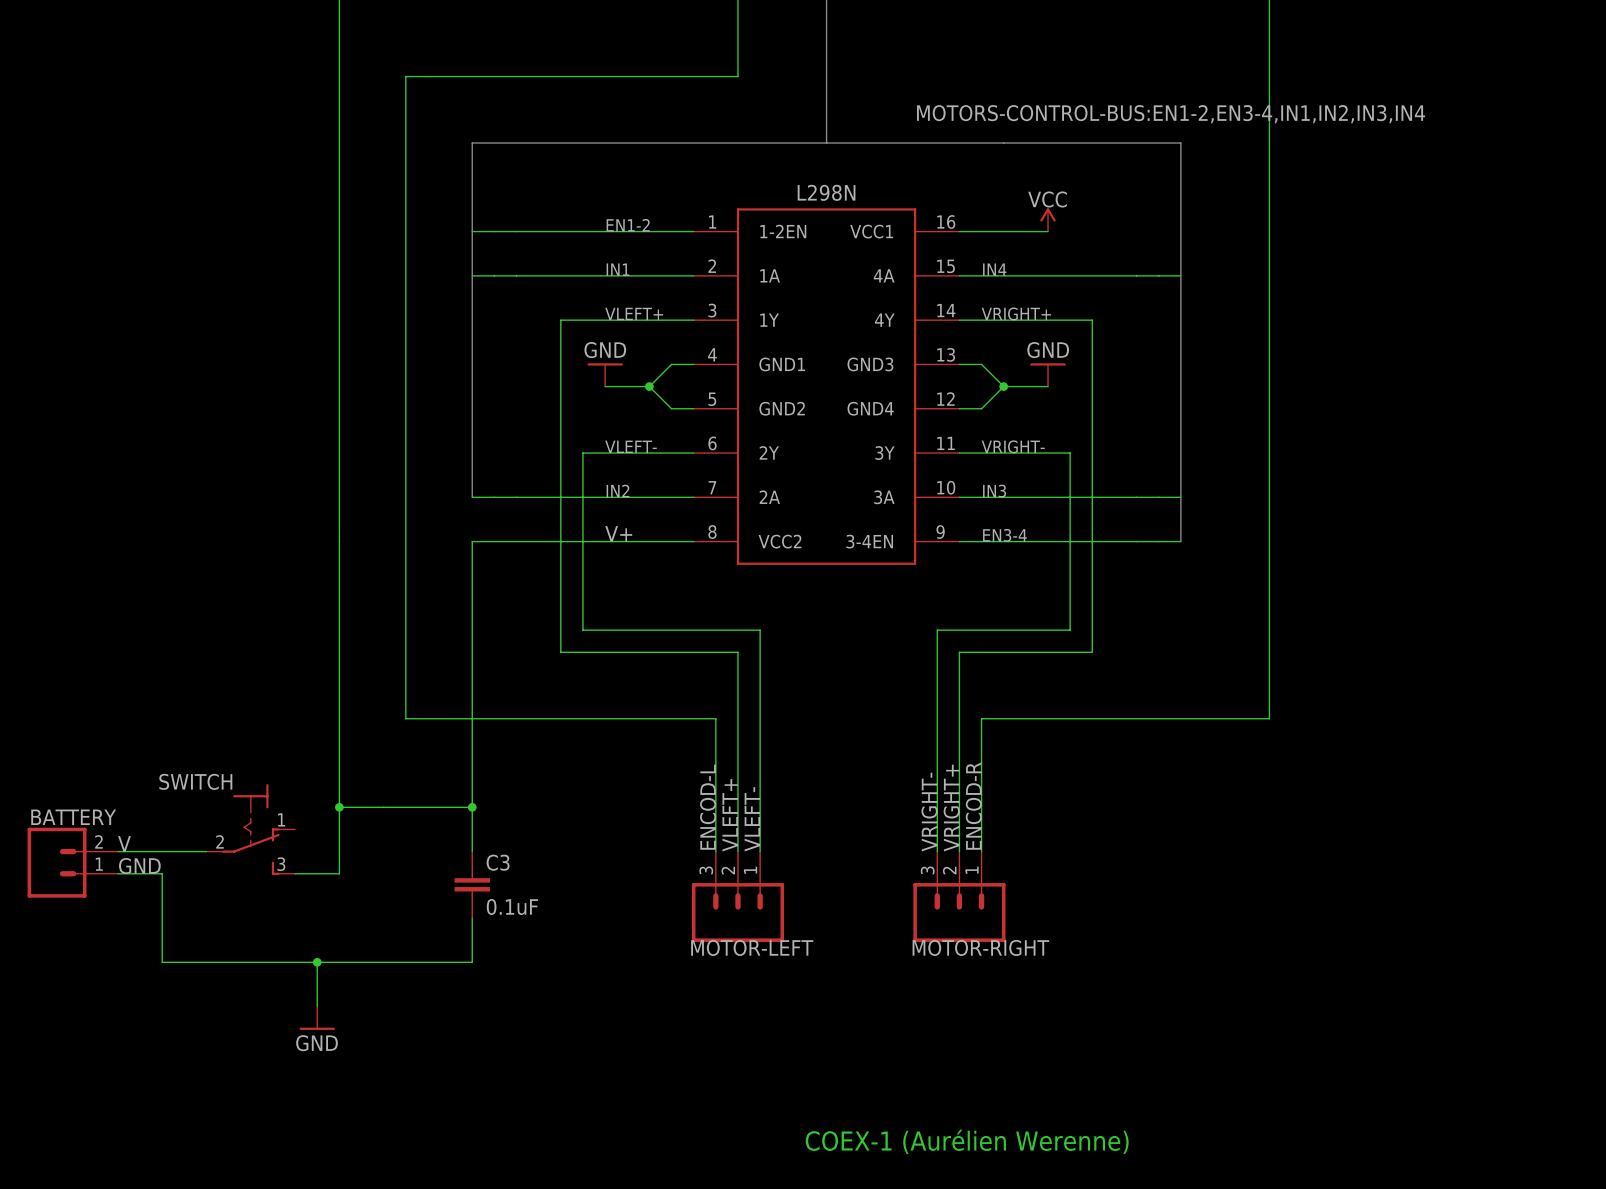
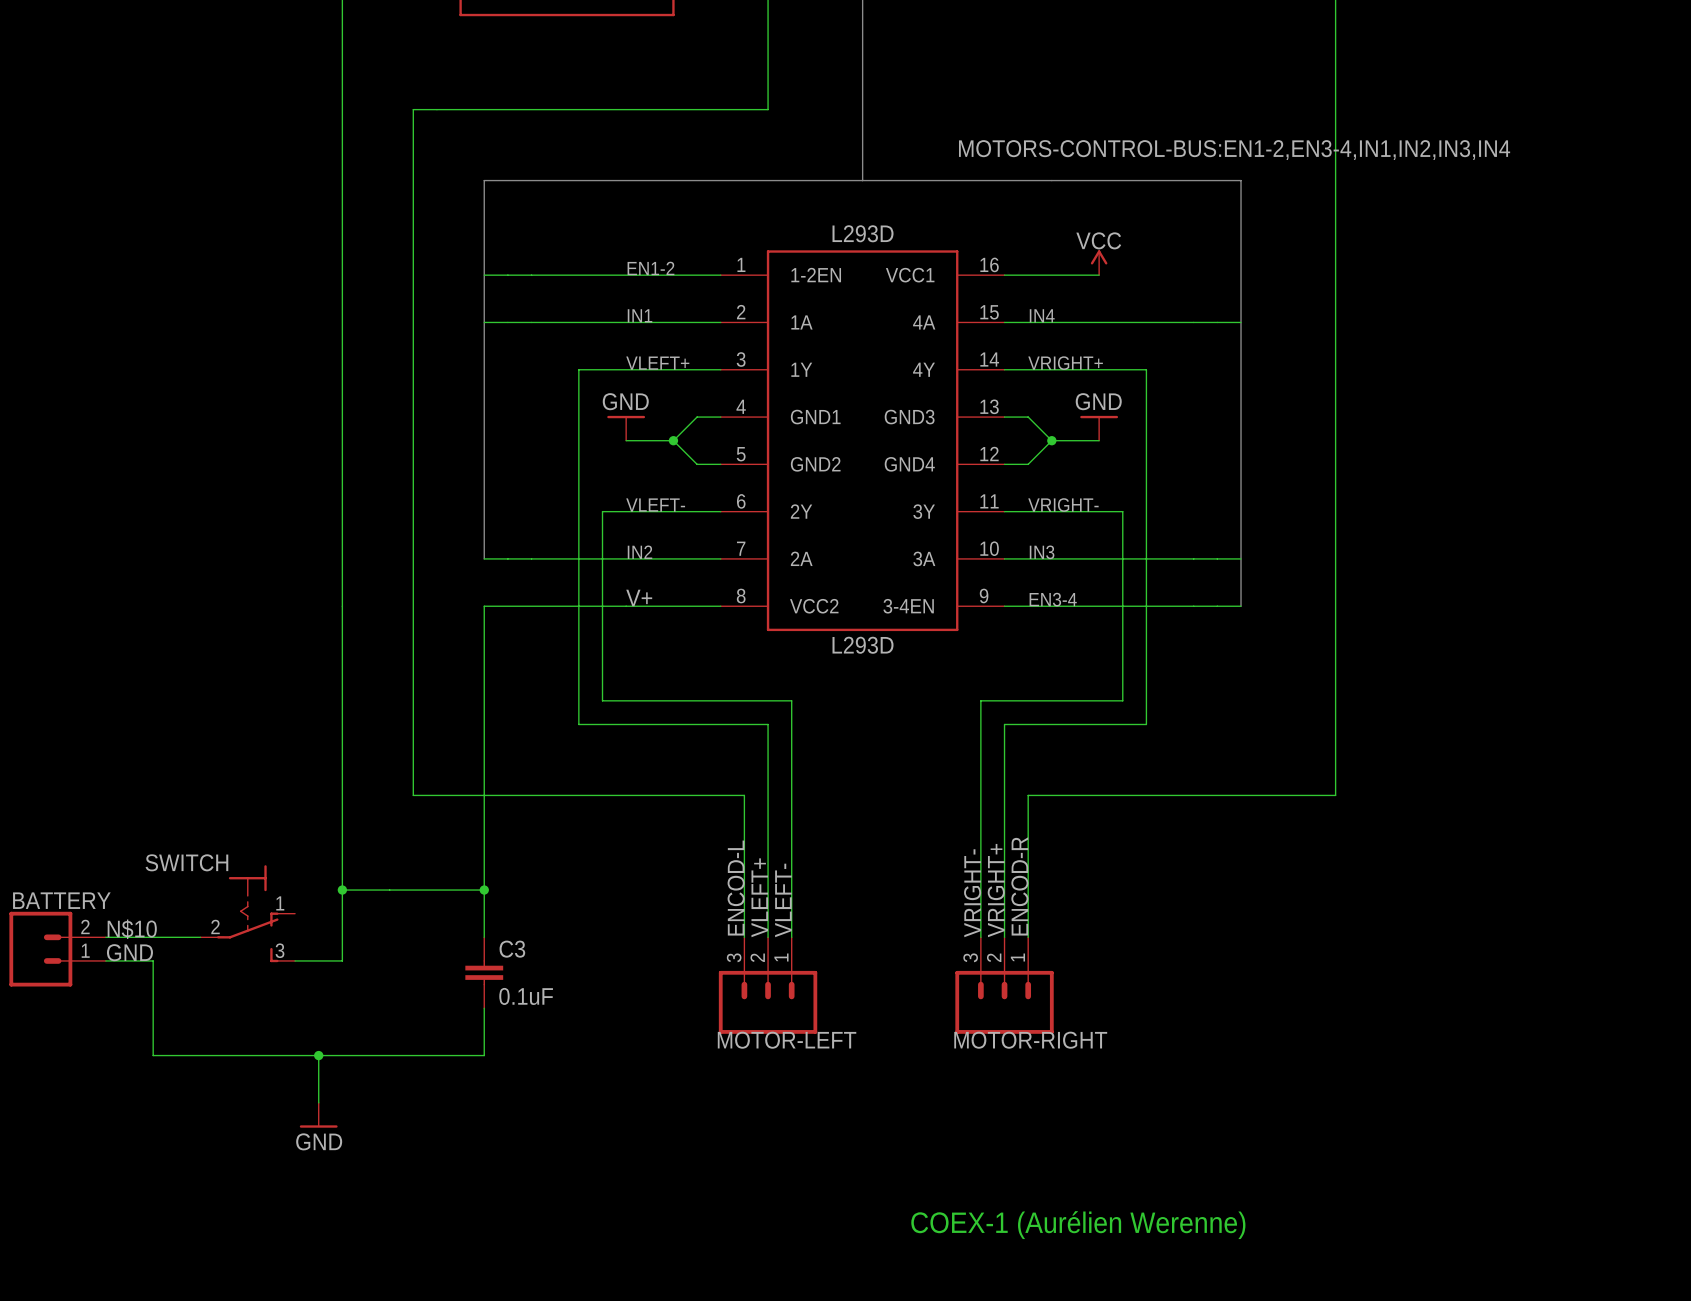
L298N name: L298N (826, 192) -> L293D (863, 233)
L298N value: none -> L293D (863, 645)
label: V (124, 843) -> N$10 (132, 929)
text position: COEX-1 (Aurélien Werenne) (967, 1141) -> COEX-1 (Aurélien Werenne) (1078, 1225)

